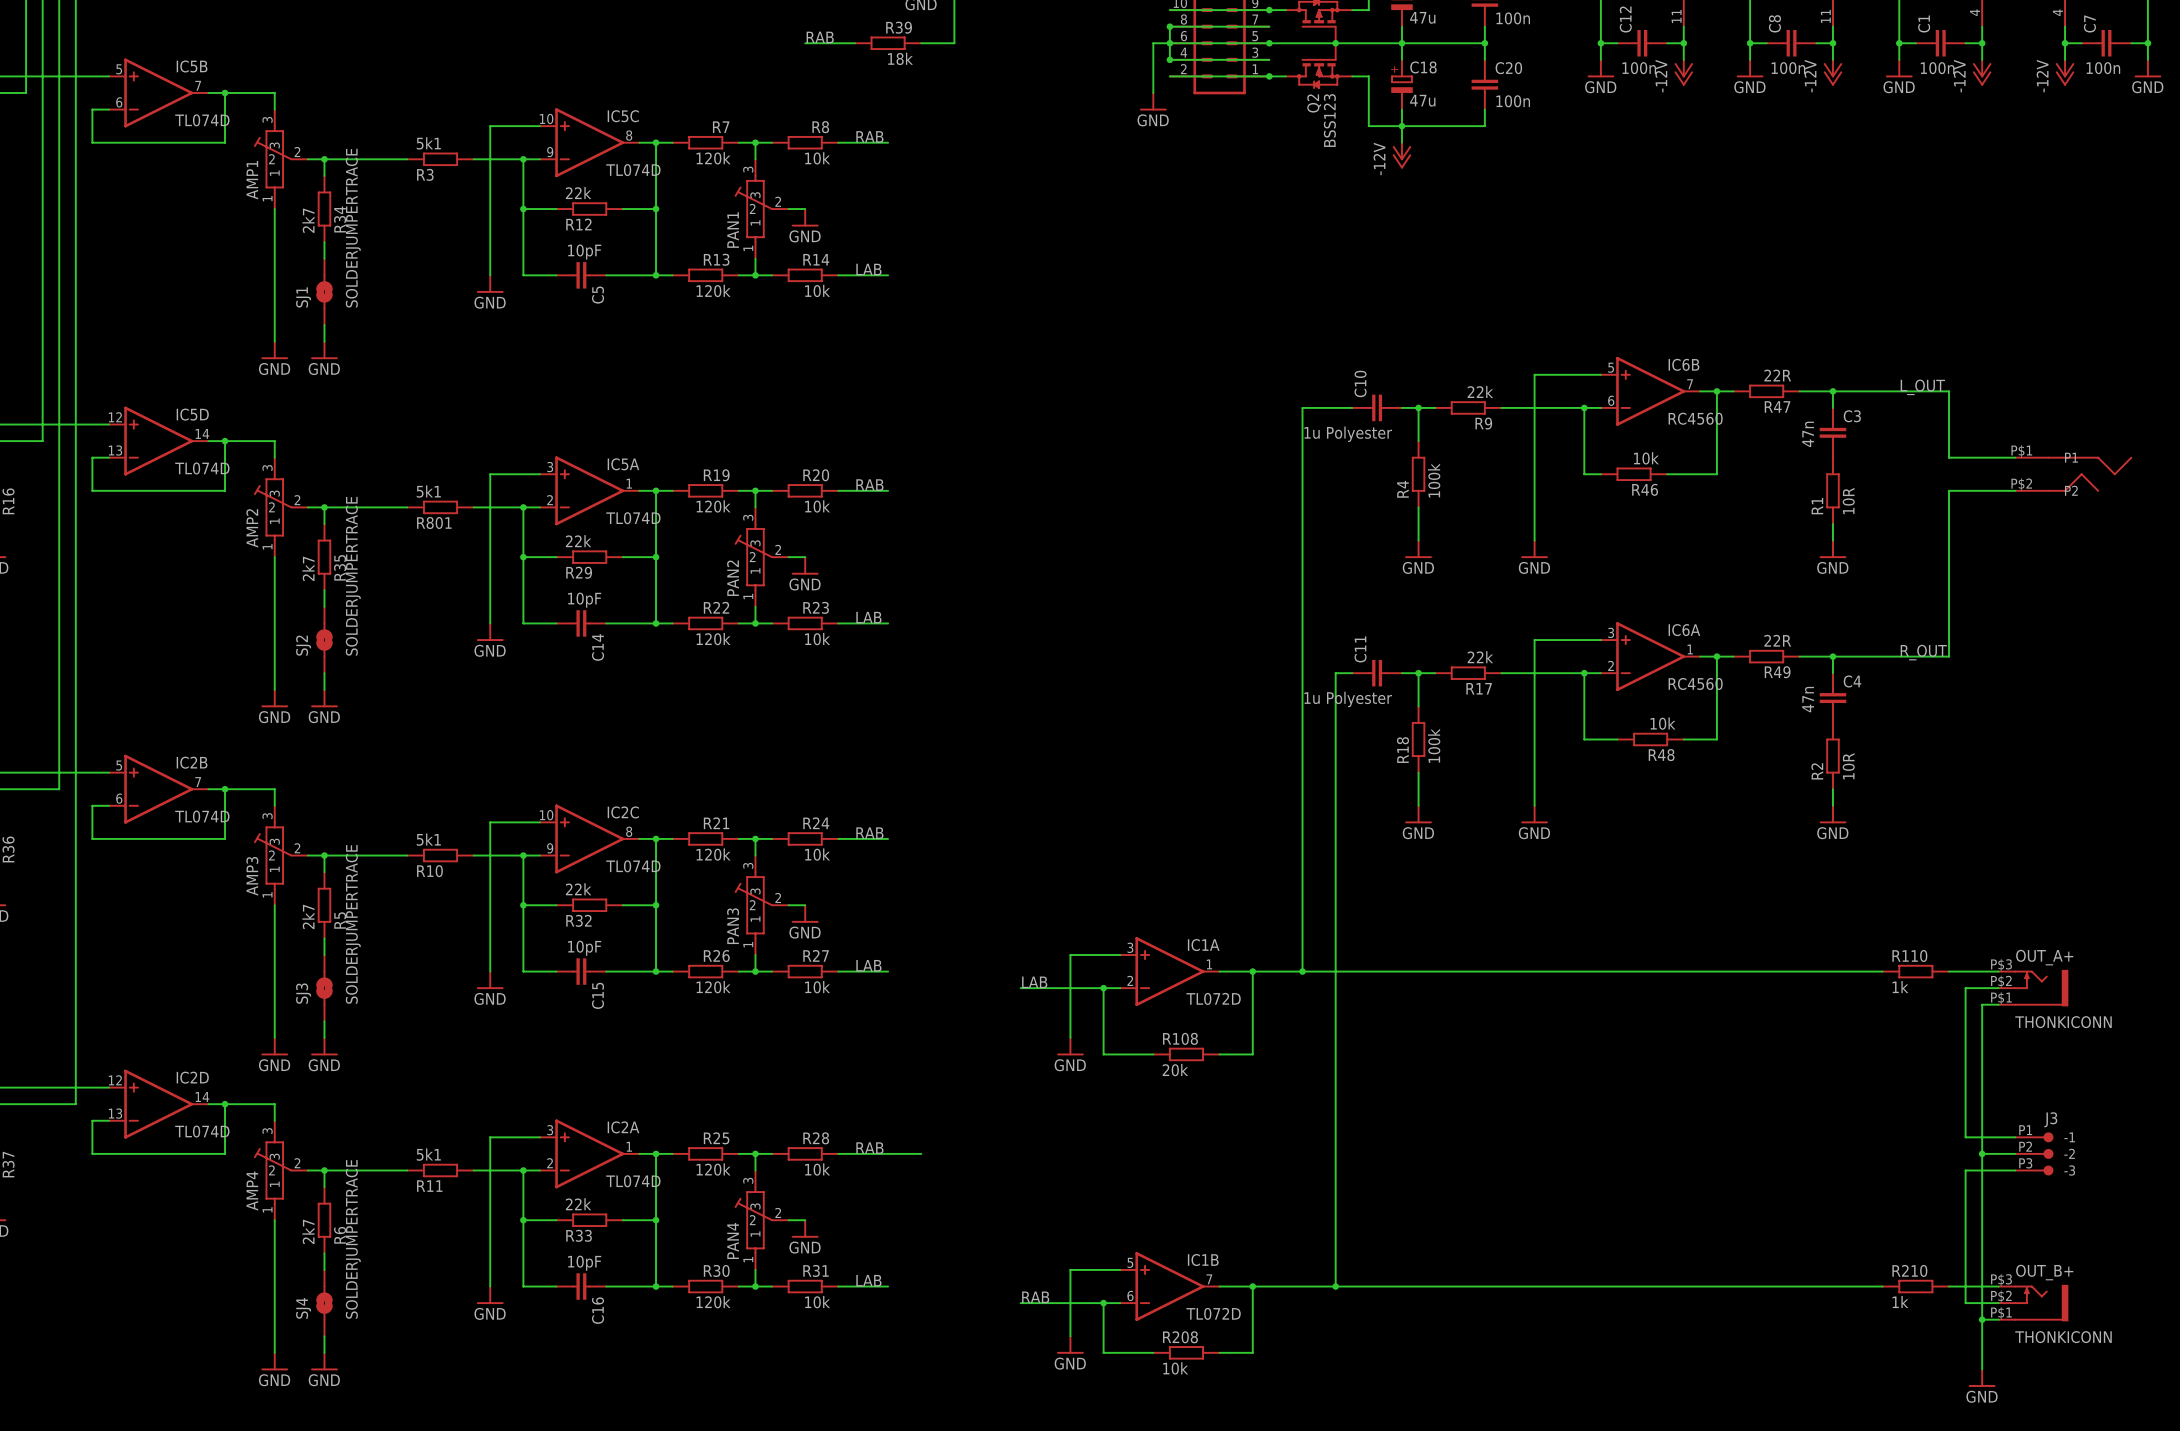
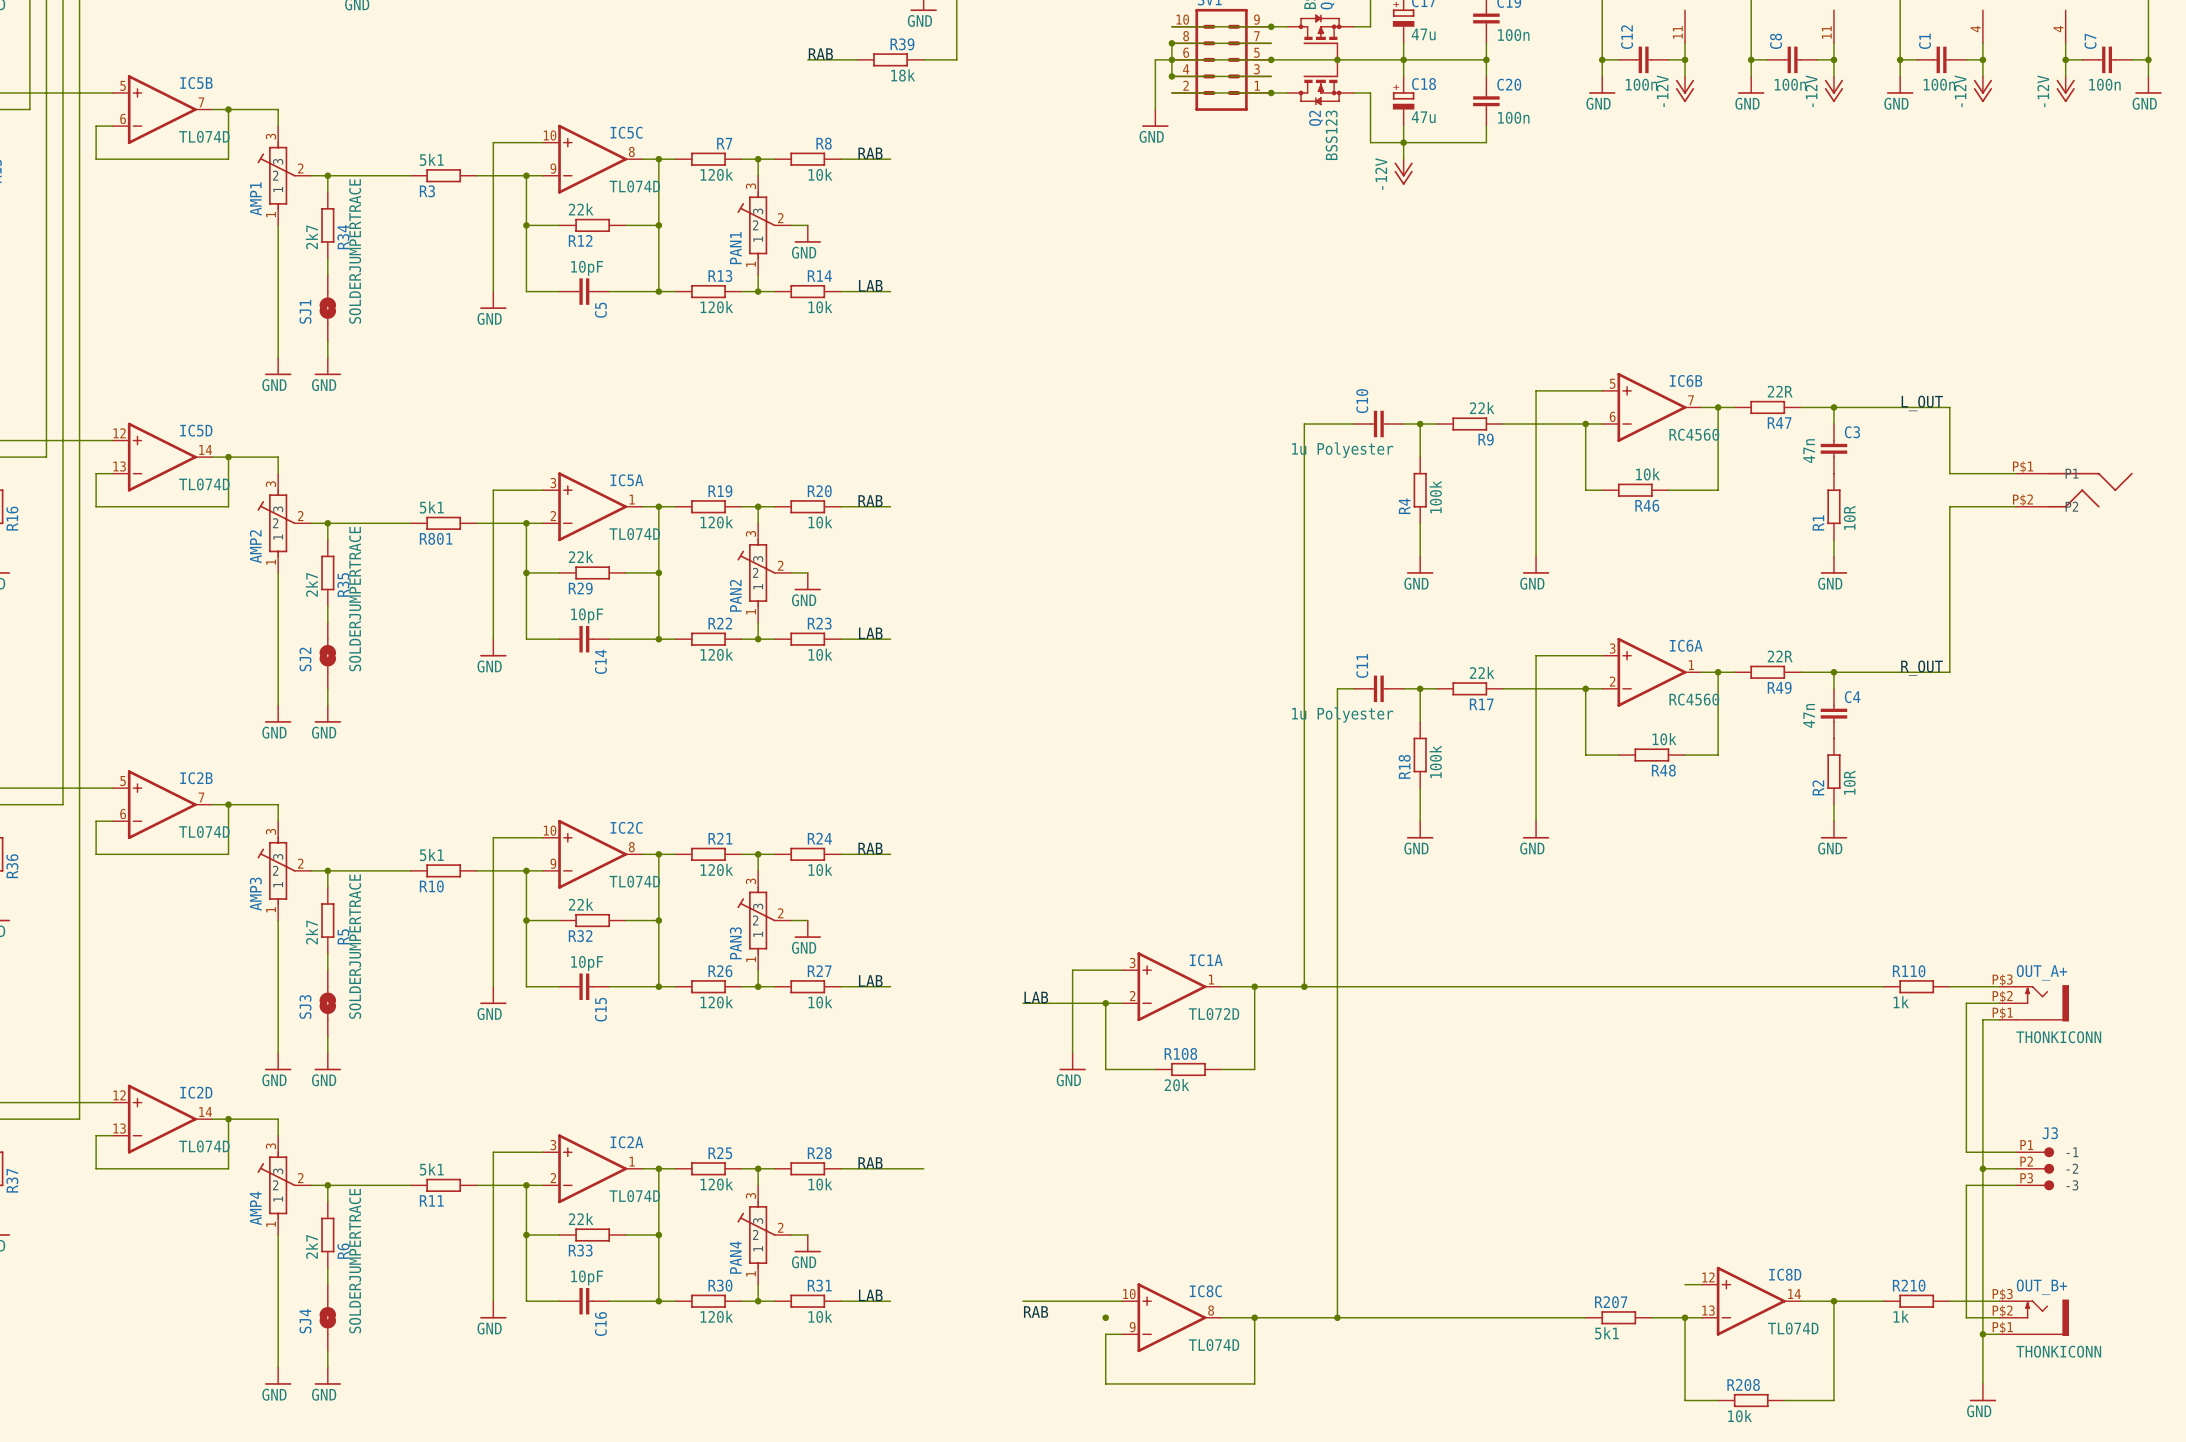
wire: (1120, 1269) (1070, 1269) (1070, 1336) -> none
wire: none -> (1685, 1284) (1701, 1284)
IC1B: TL072D (1169, 1286) -> none
wire: (1219, 1286) (1799, 1286) -> none
wire: (1252, 1286) (1252, 1303) -> (1337, 1301) (1337, 1317)
junction position: (1252, 1286) -> (1254, 1317)
junction position: (1335, 1286) -> (1337, 1317)
IC8D: none -> TL074D (1751, 1301)
wire: none -> (1833, 1301) (1833, 1400) (1784, 1400)
junction: none -> (1833, 1301)
wire: (1020, 1303) (1120, 1303) -> (1022, 1301) (1122, 1301)
wire: (1103, 1303) (1103, 1319) -> (1122, 1334) (1105, 1334)
IC8C: none -> TL074D (1171, 1317)
wire: none -> (1221, 1317) (1585, 1317)
R207: none -> 5k1 (1618, 1317)
wire: none -> (1651, 1317) (1701, 1317)
wire: none -> (1685, 1317) (1685, 1400) (1718, 1400)
junction: none -> (1685, 1317)
power symbol: GND (1070, 1344) -> none
wire: (1103, 1352) (1153, 1352) -> (1105, 1367) (1105, 1383) (1254, 1383) (1254, 1367)
R208 position: (1186, 1352) -> (1751, 1400)
wire: (1219, 1352) (1252, 1352) -> none

